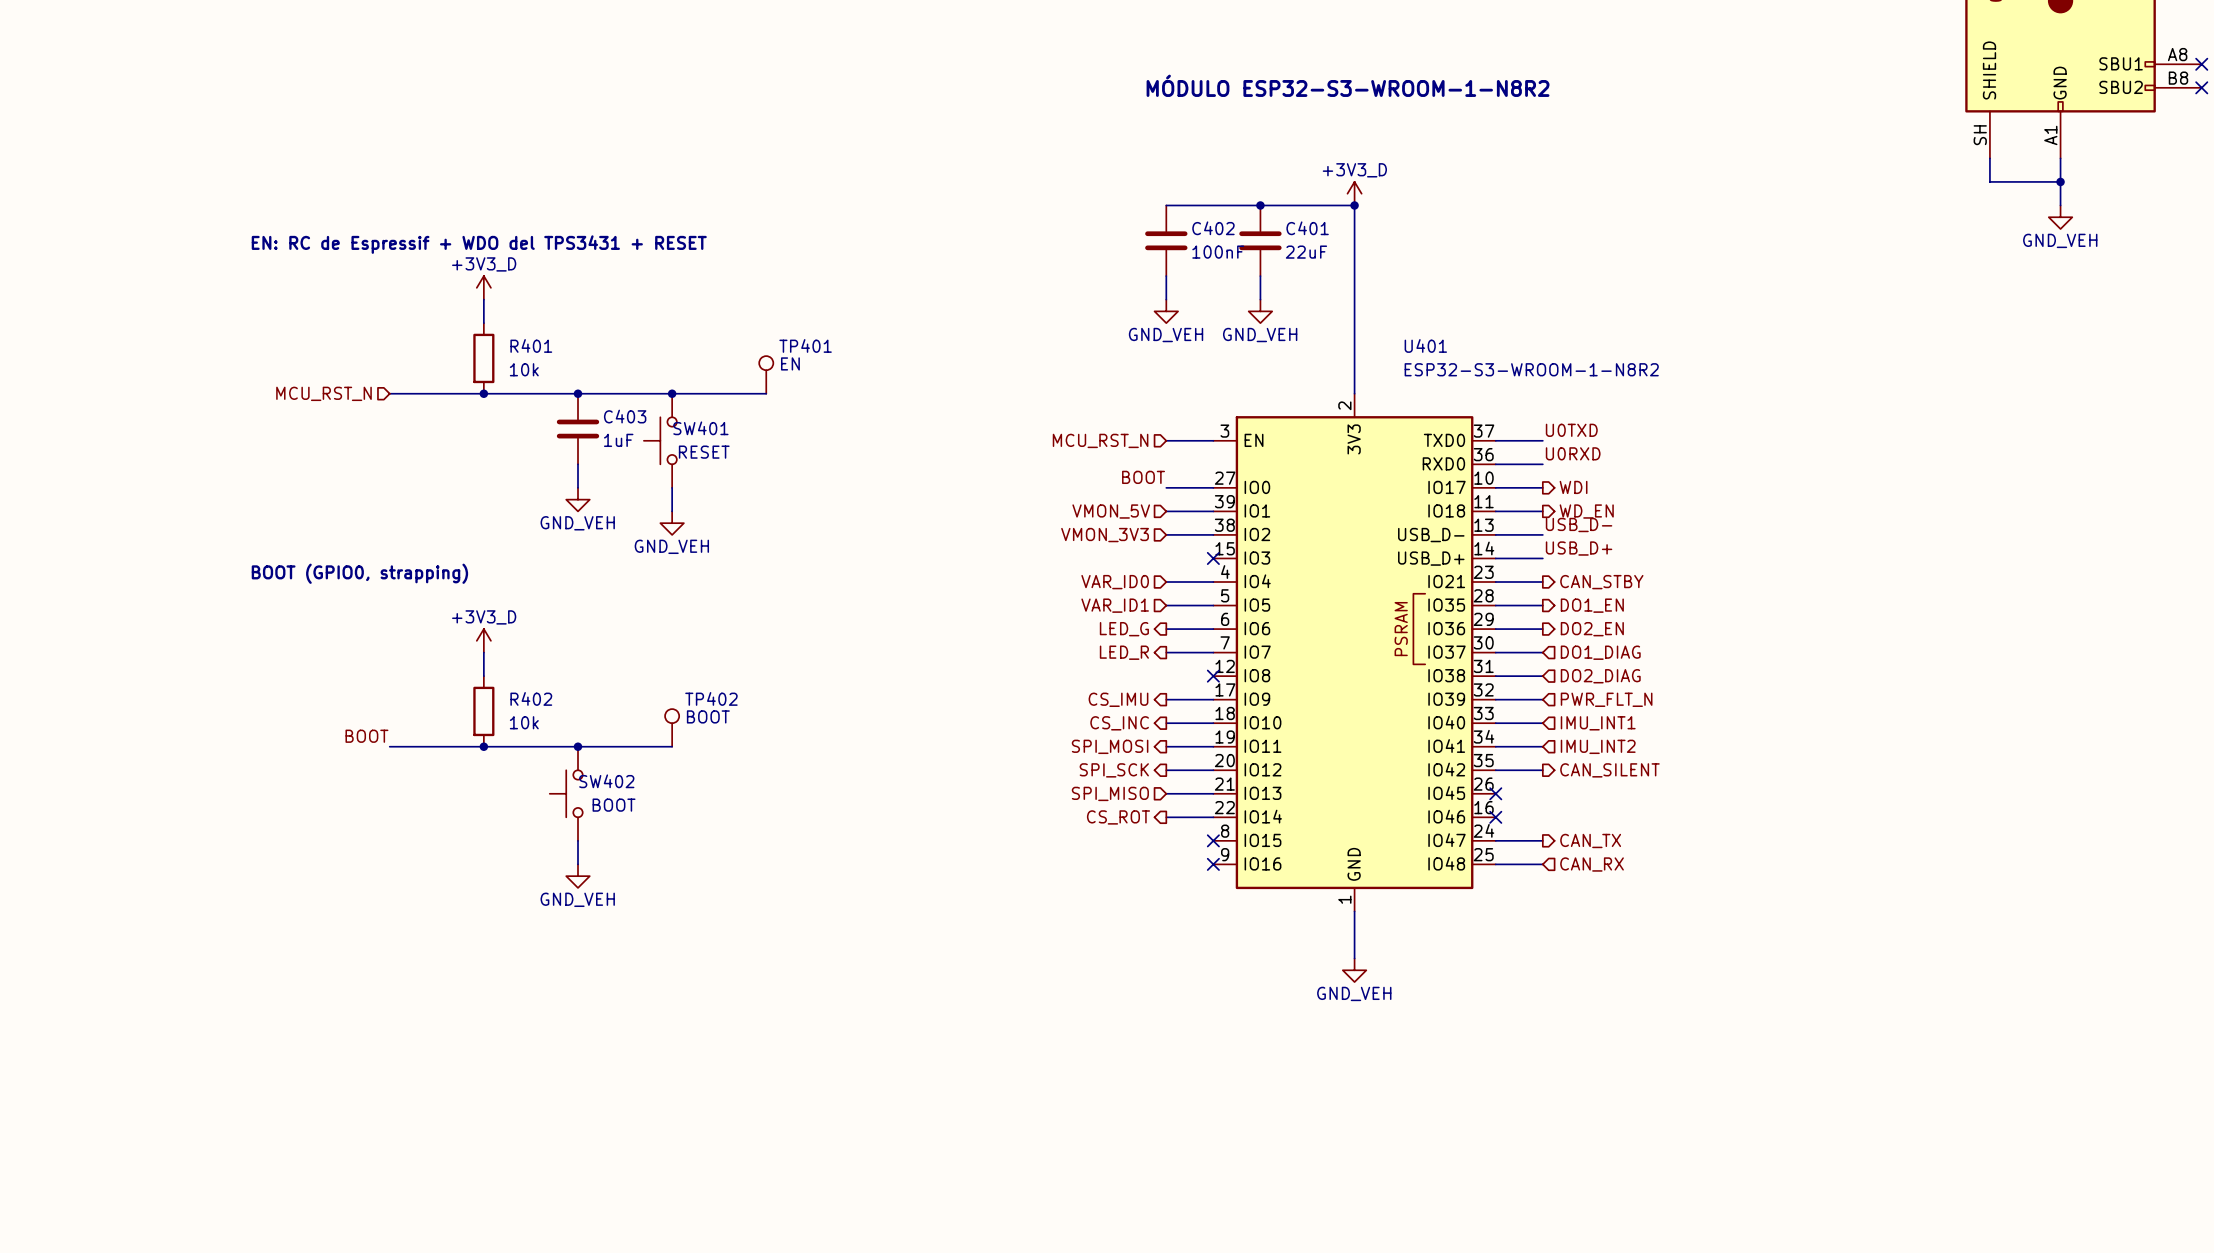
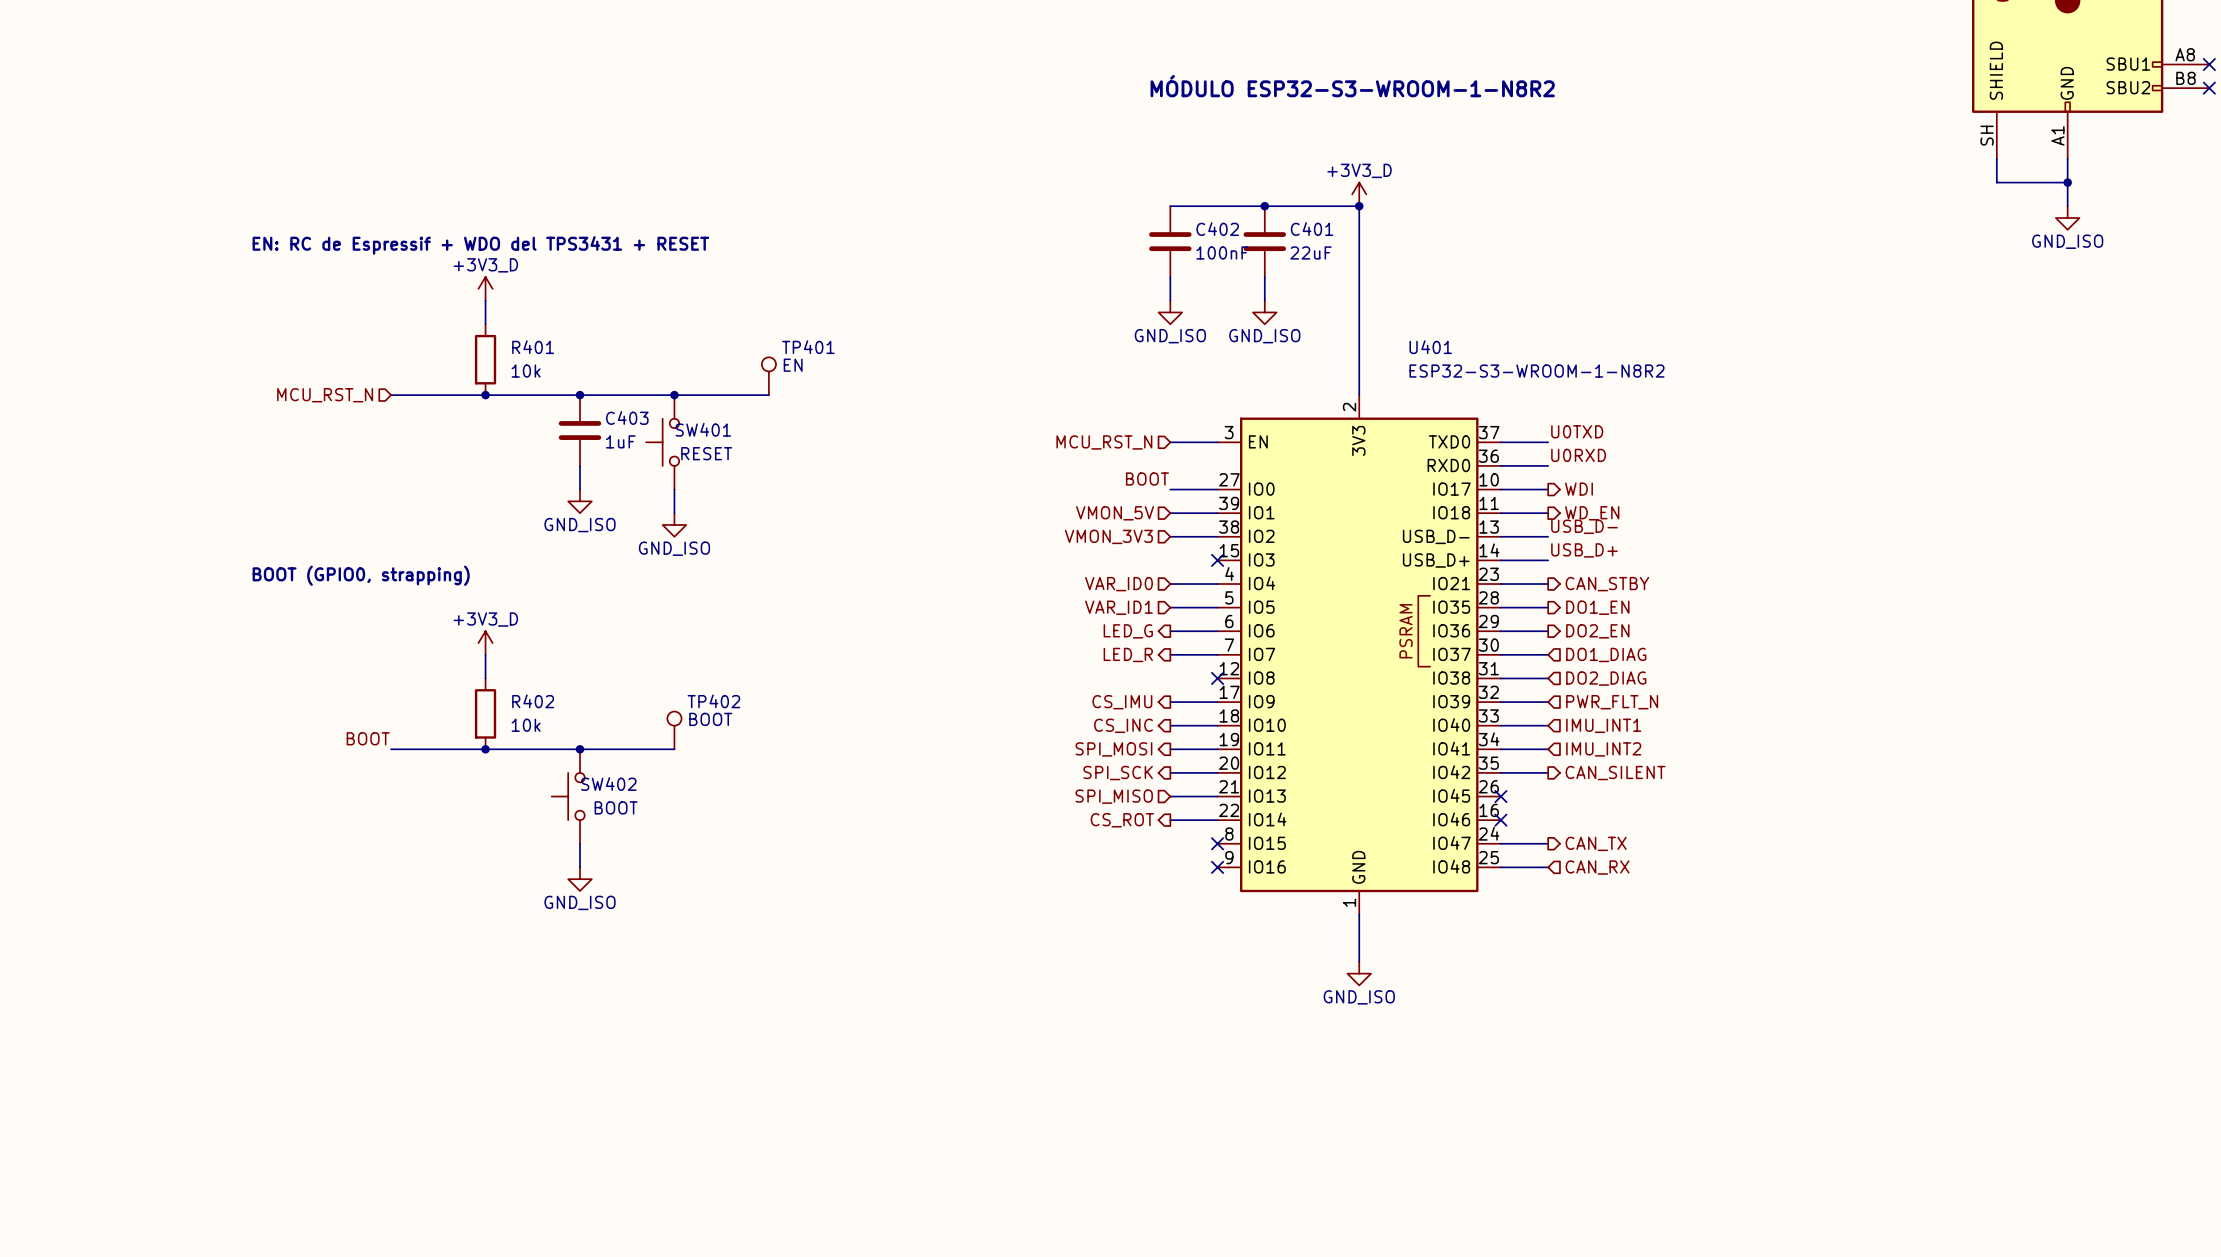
power symbol: GND_VEH (2060, 217) -> GND_ISO (2067, 217)
power symbol: GND_VEH (1166, 311) -> GND_ISO (1170, 312)
power symbol: GND_VEH (1260, 311) -> GND_ISO (1264, 312)
power symbol: GND_VEH (578, 499) -> GND_ISO (579, 501)
power symbol: GND_VEH (672, 523) -> GND_ISO (674, 524)
power symbol: GND_VEH (578, 876) -> GND_ISO (579, 879)
power symbol: GND_VEH (1354, 970) -> GND_ISO (1359, 973)

